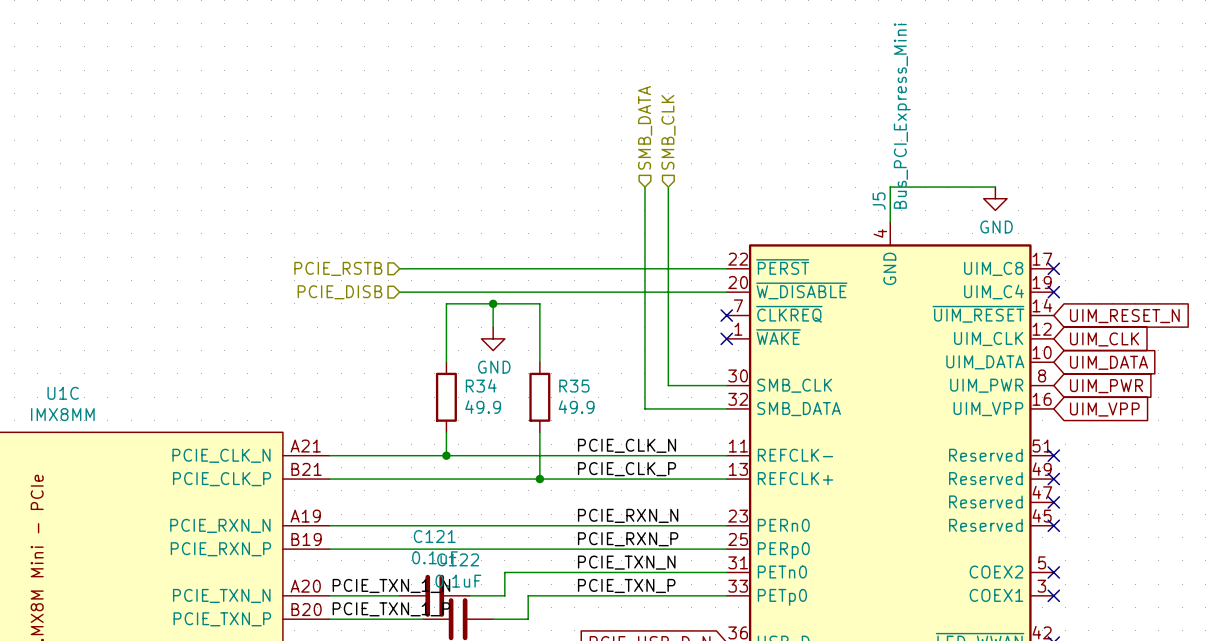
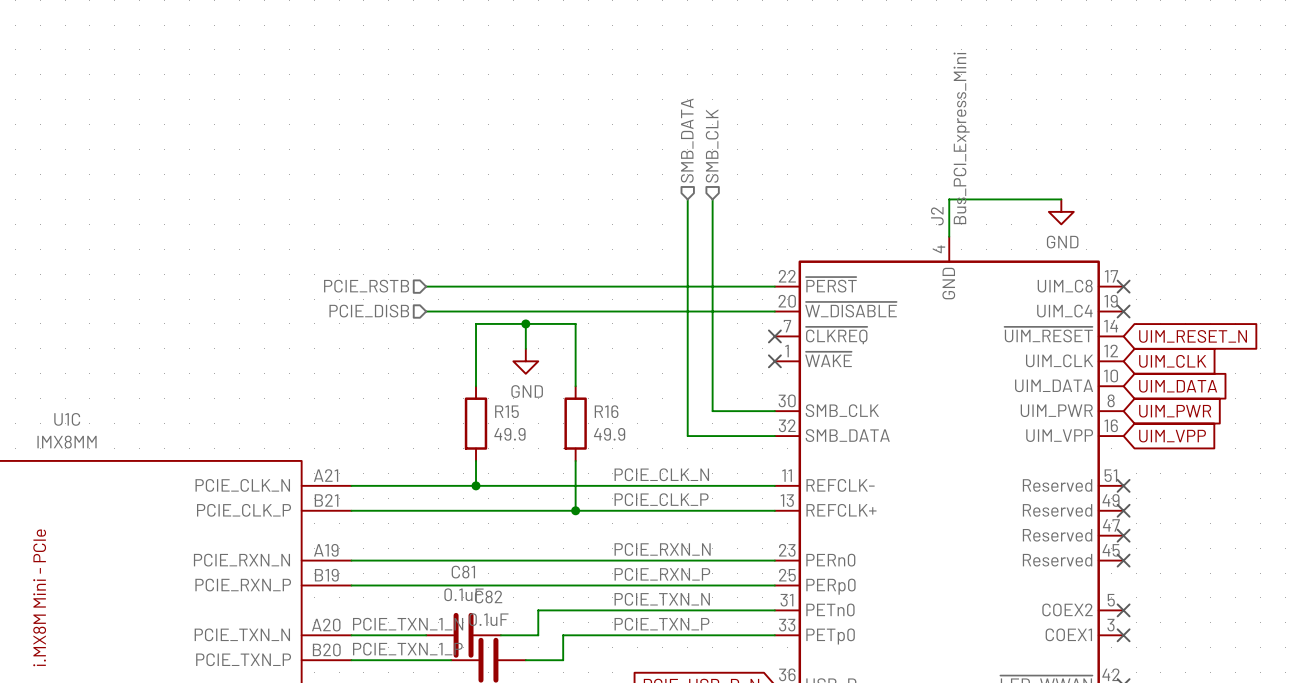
J5 name: J5 (879, 201) -> J2 (937, 216)
R34 name: R34 (481, 385) -> R15 (506, 411)
R35 name: R35 (574, 386) -> R16 (606, 411)
C121 name: C121 (434, 536) -> C81 (463, 572)
C122 name: C122 (458, 559) -> C82 (488, 596)

